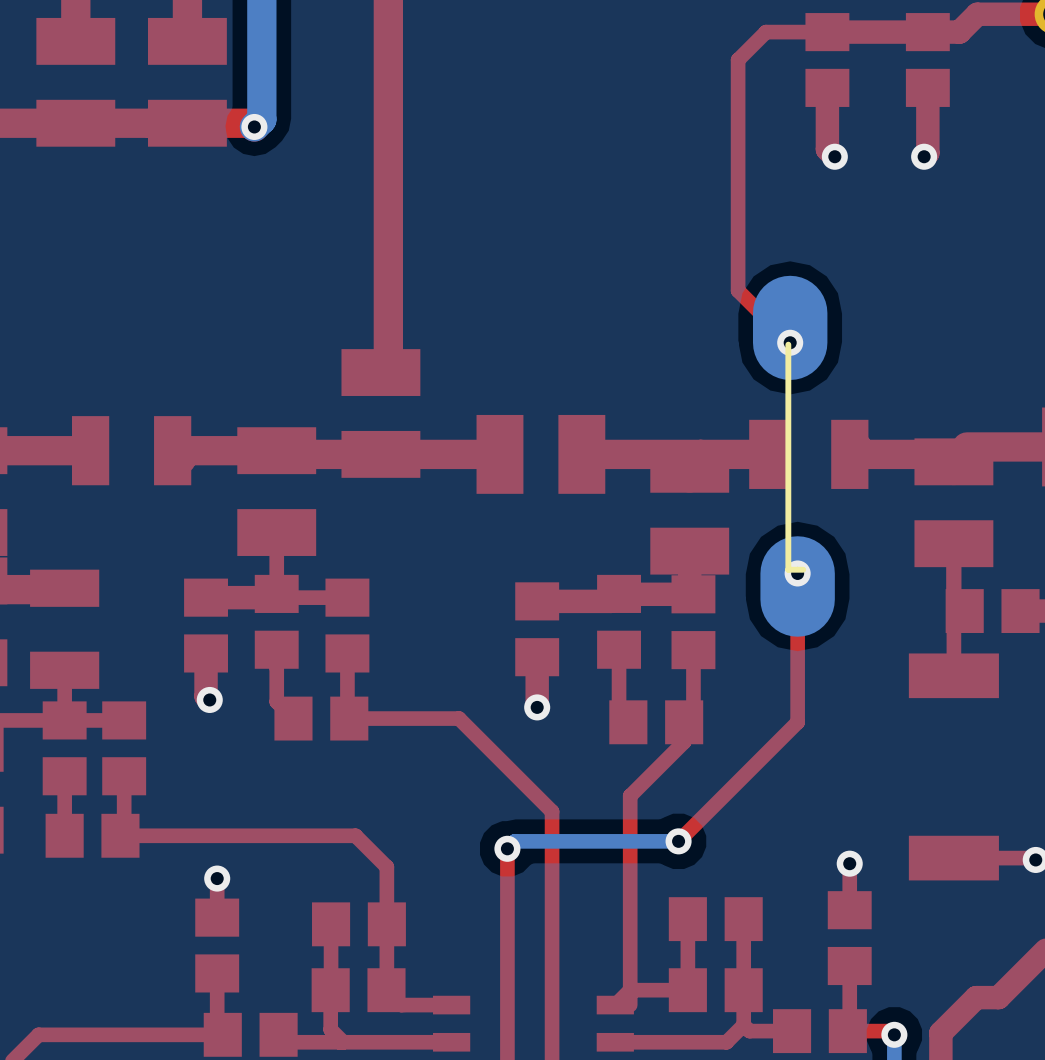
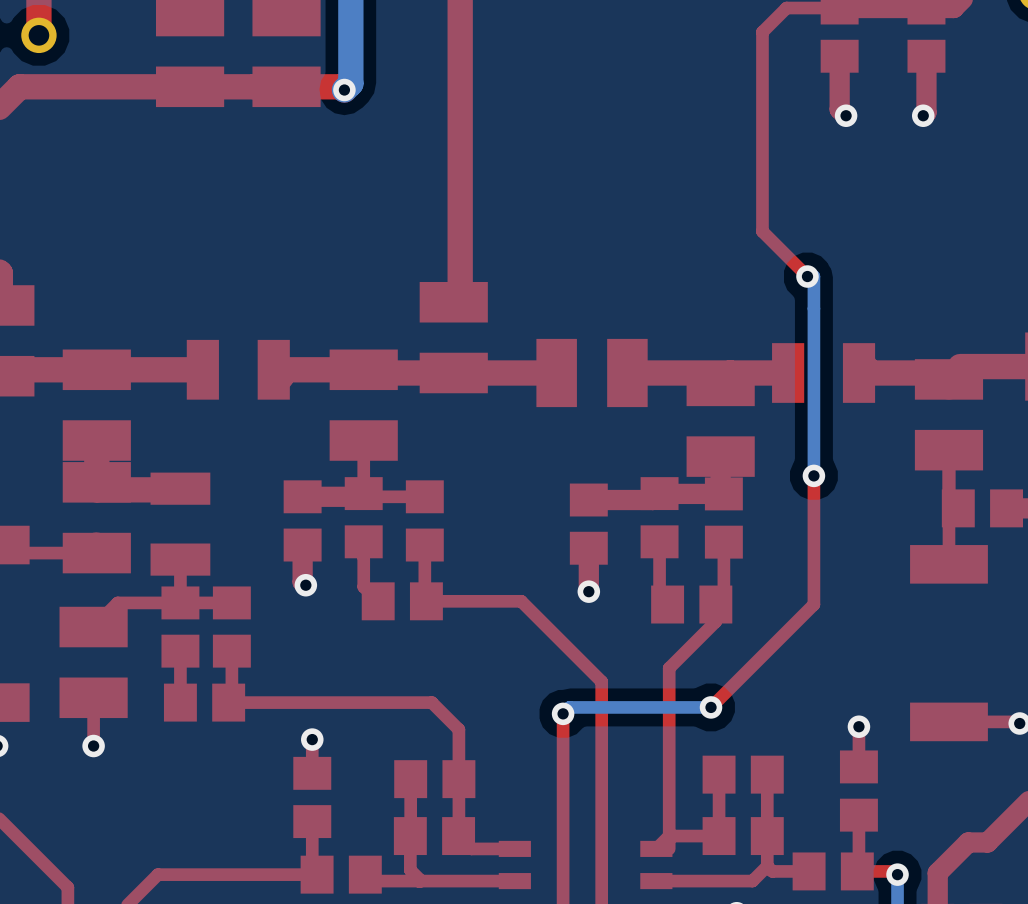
bottom track: (790, 313) (790, 342) -> none
line: (788, 344) (788, 569) (803, 569) -> none
bottom track: (797, 573) (797, 599) -> (813, 475) (813, 276)

